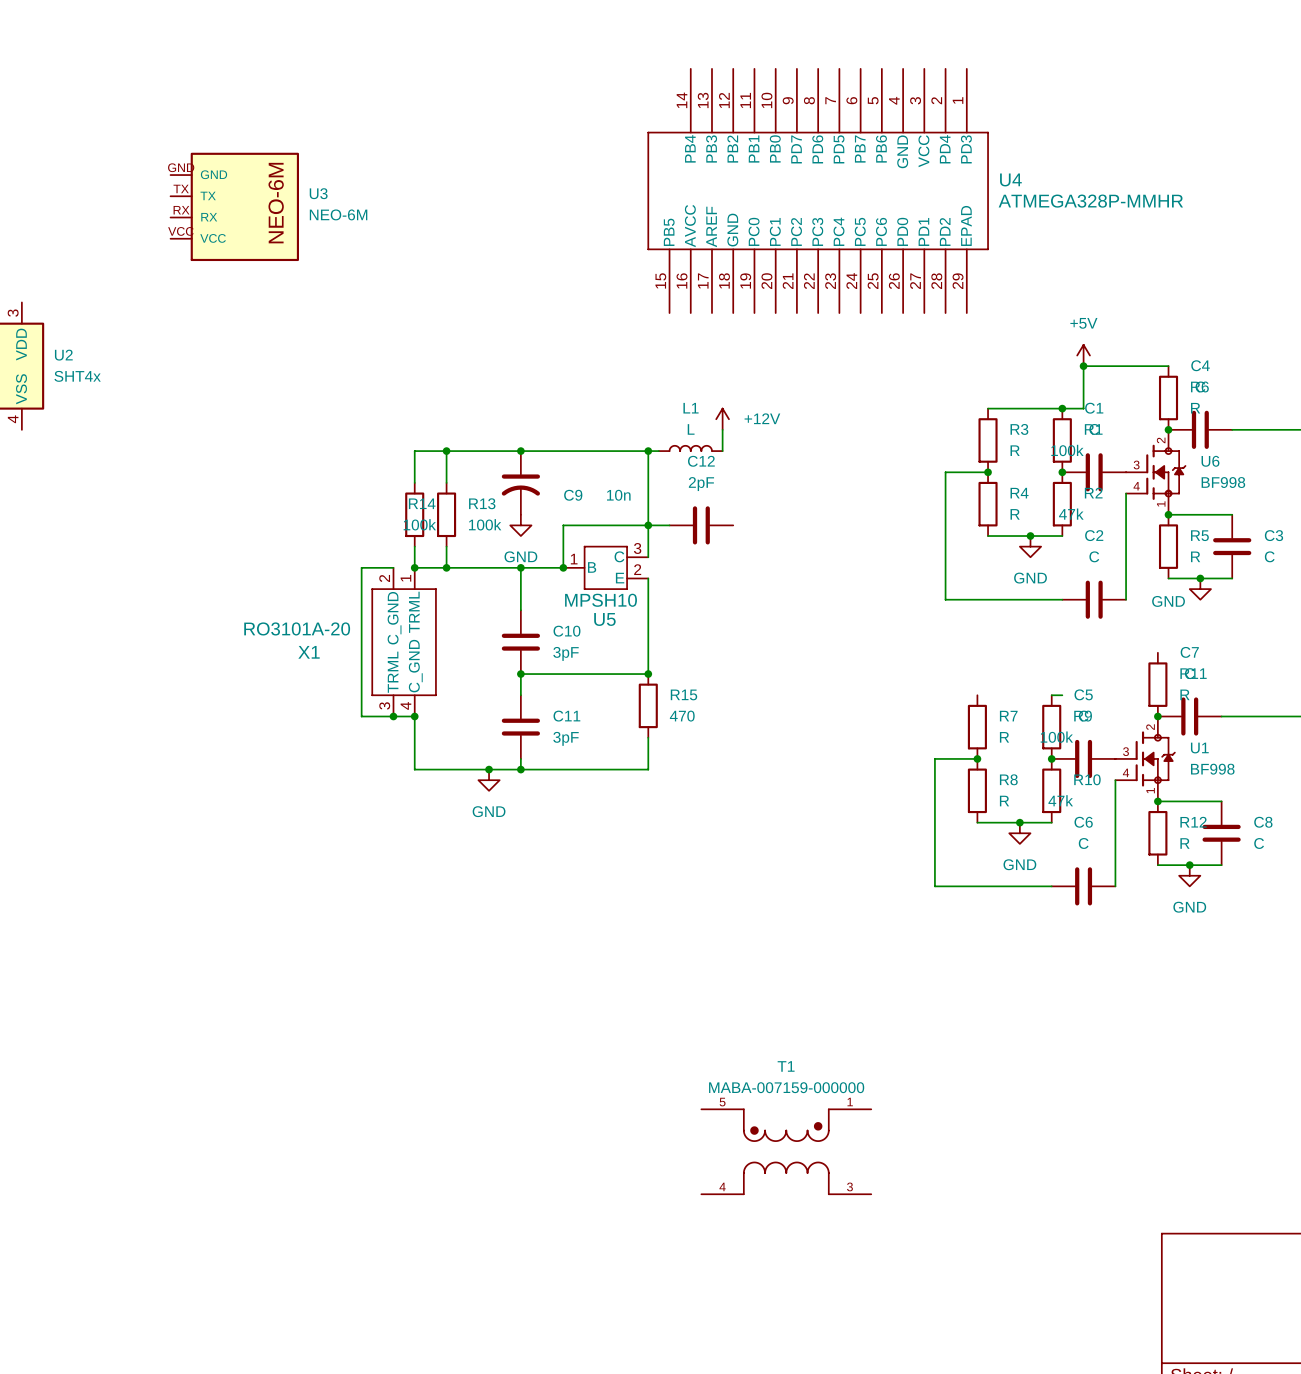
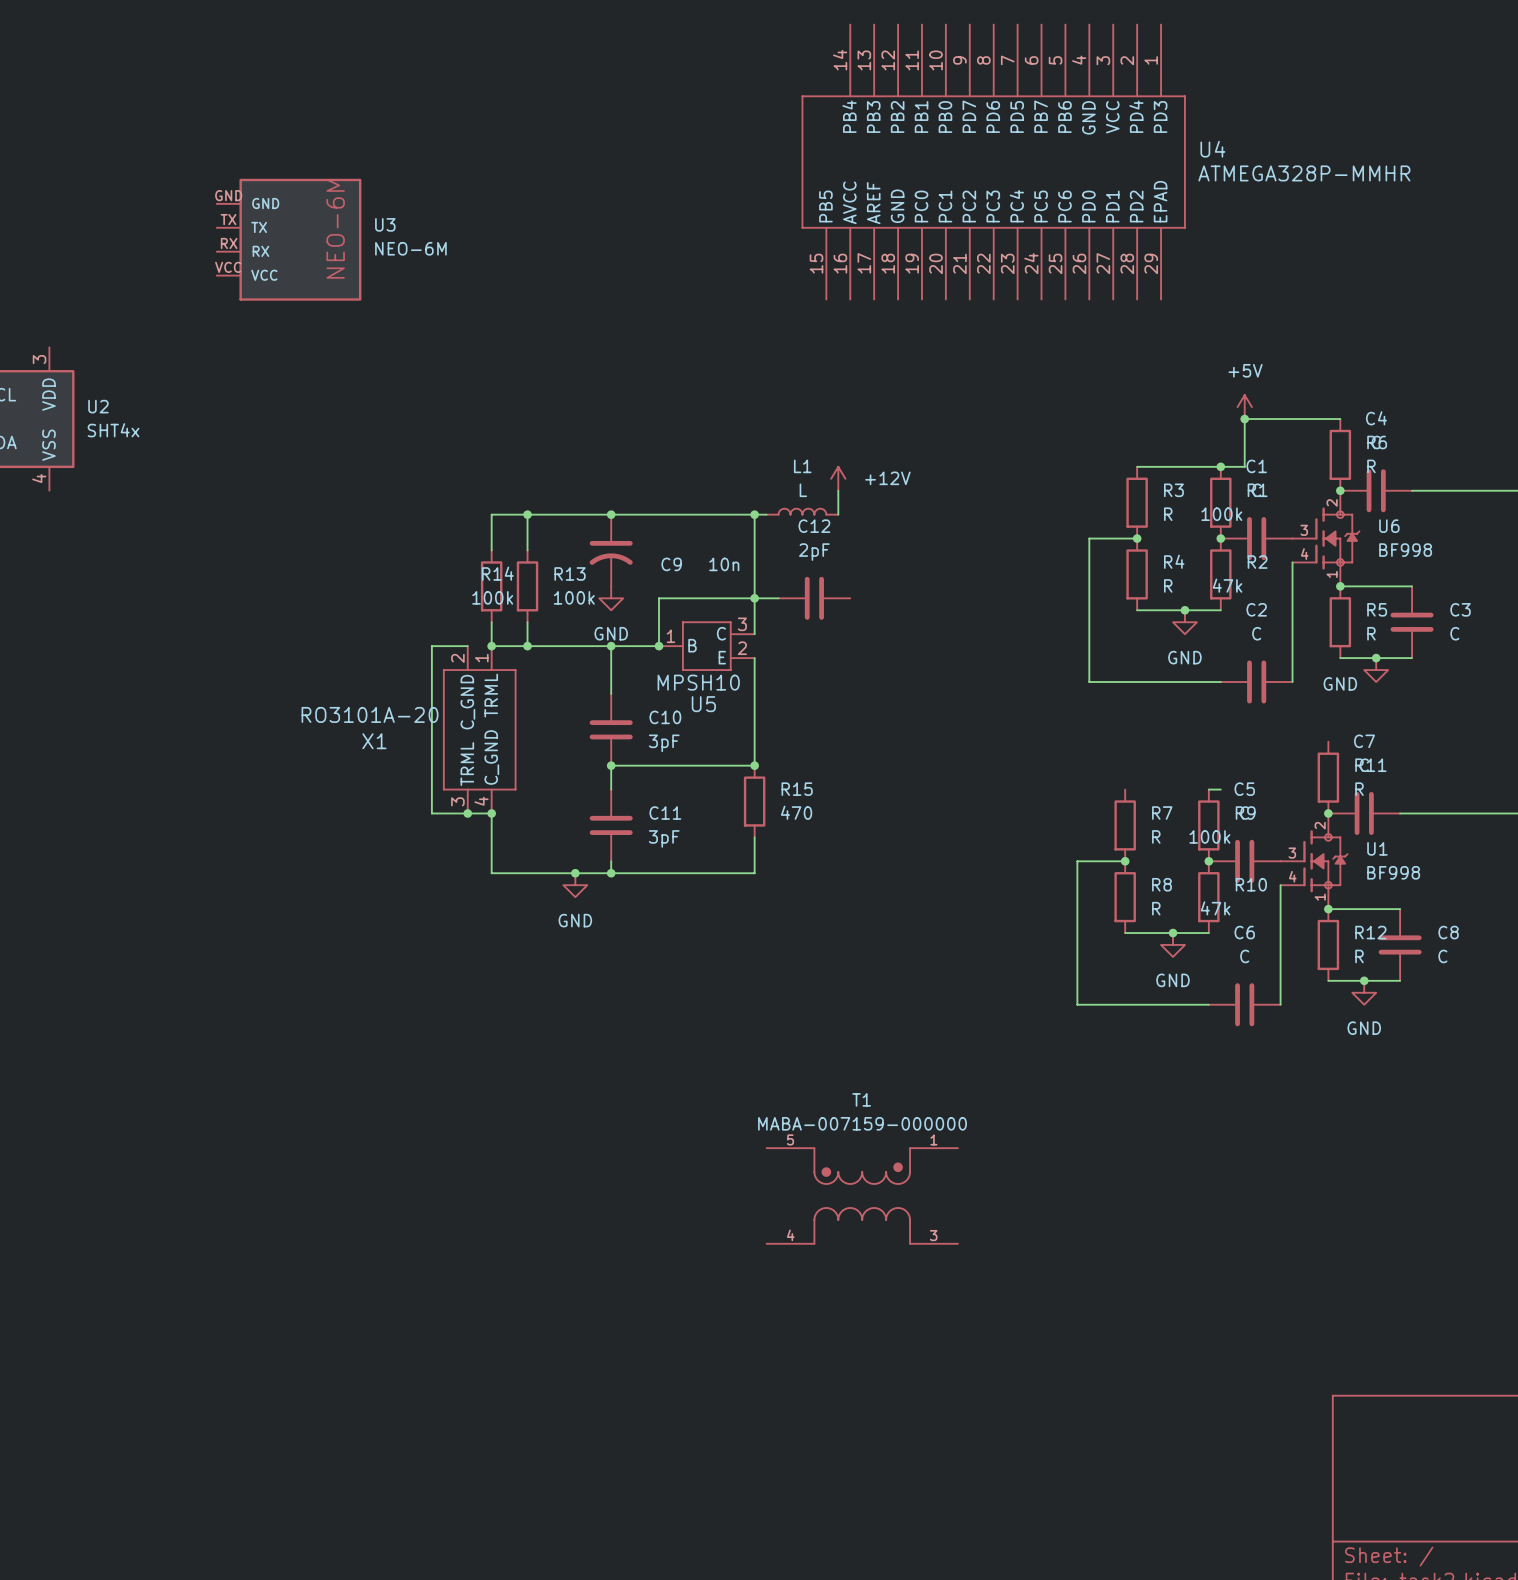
U4 position: (818, 190) -> (993, 162)
T1 position: (786, 1151) -> (862, 1195)

